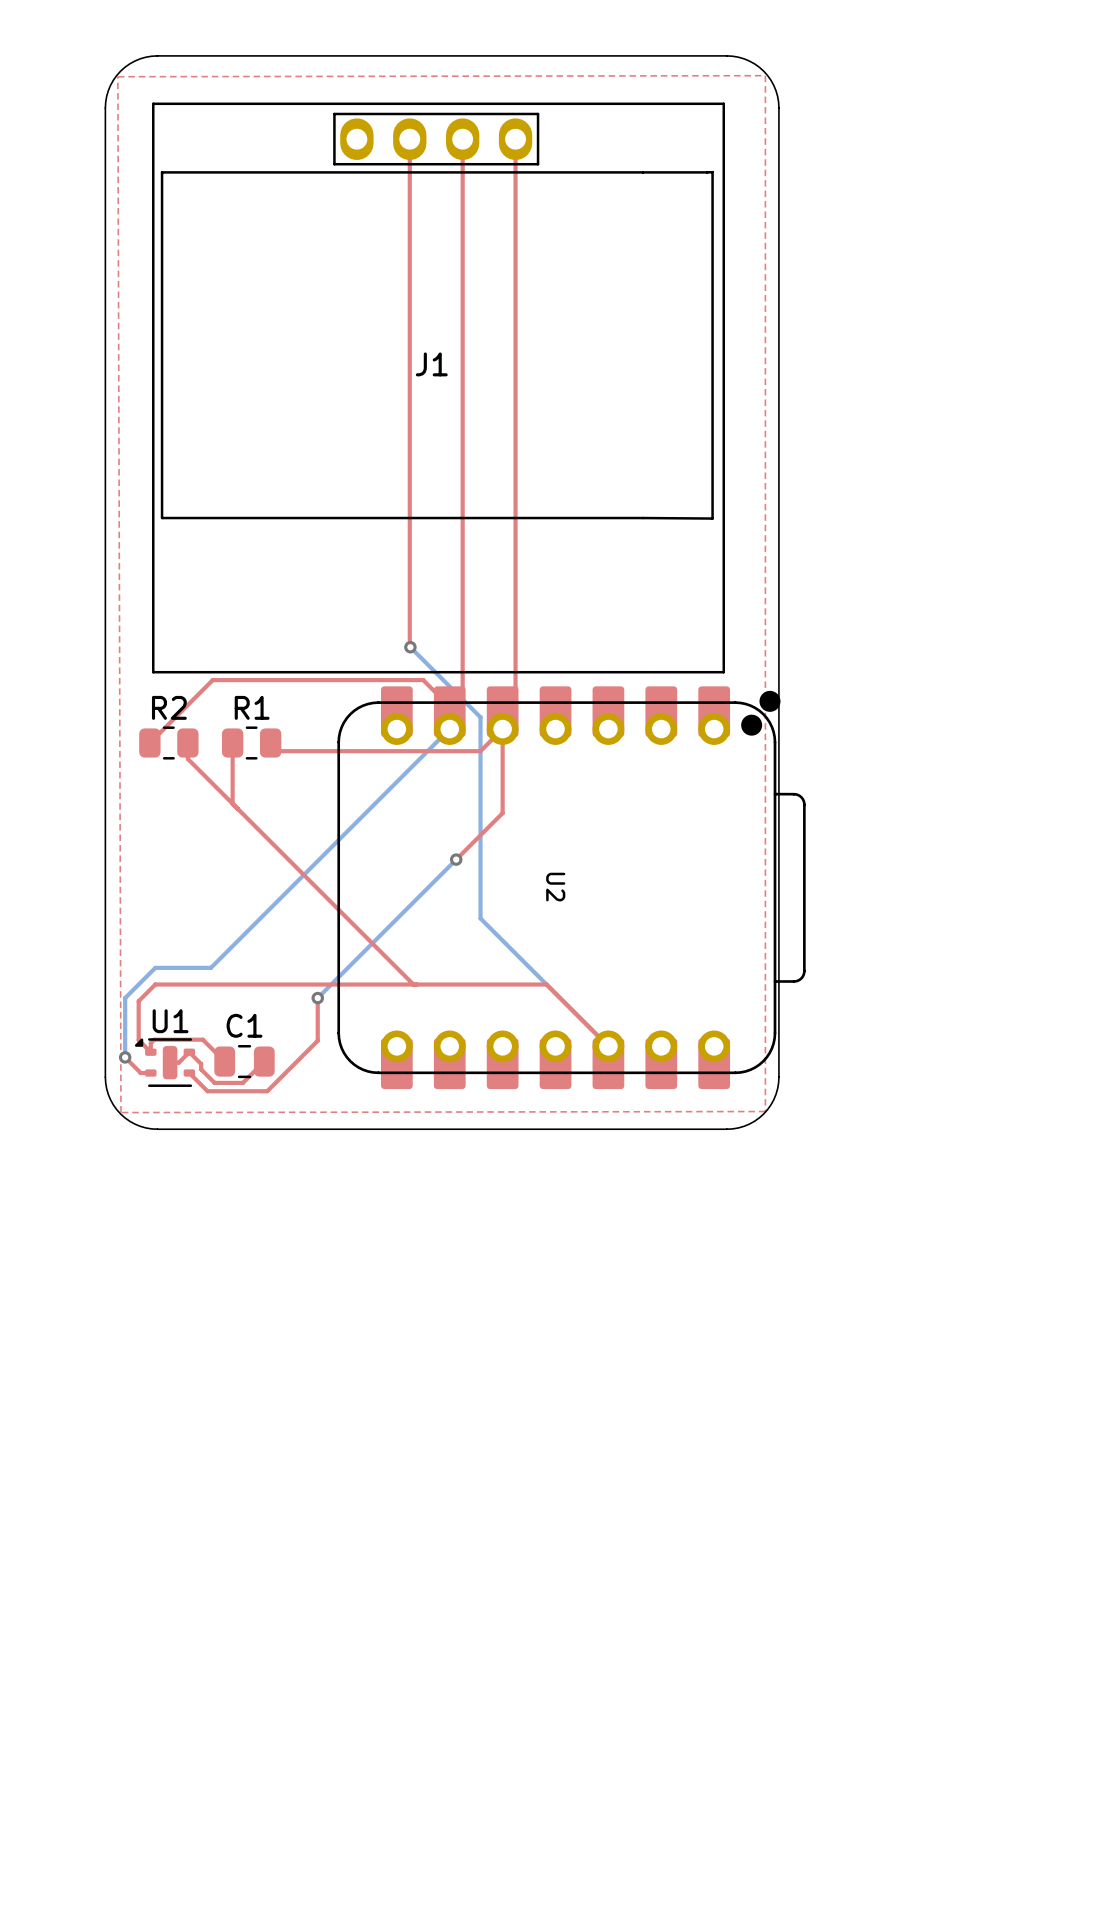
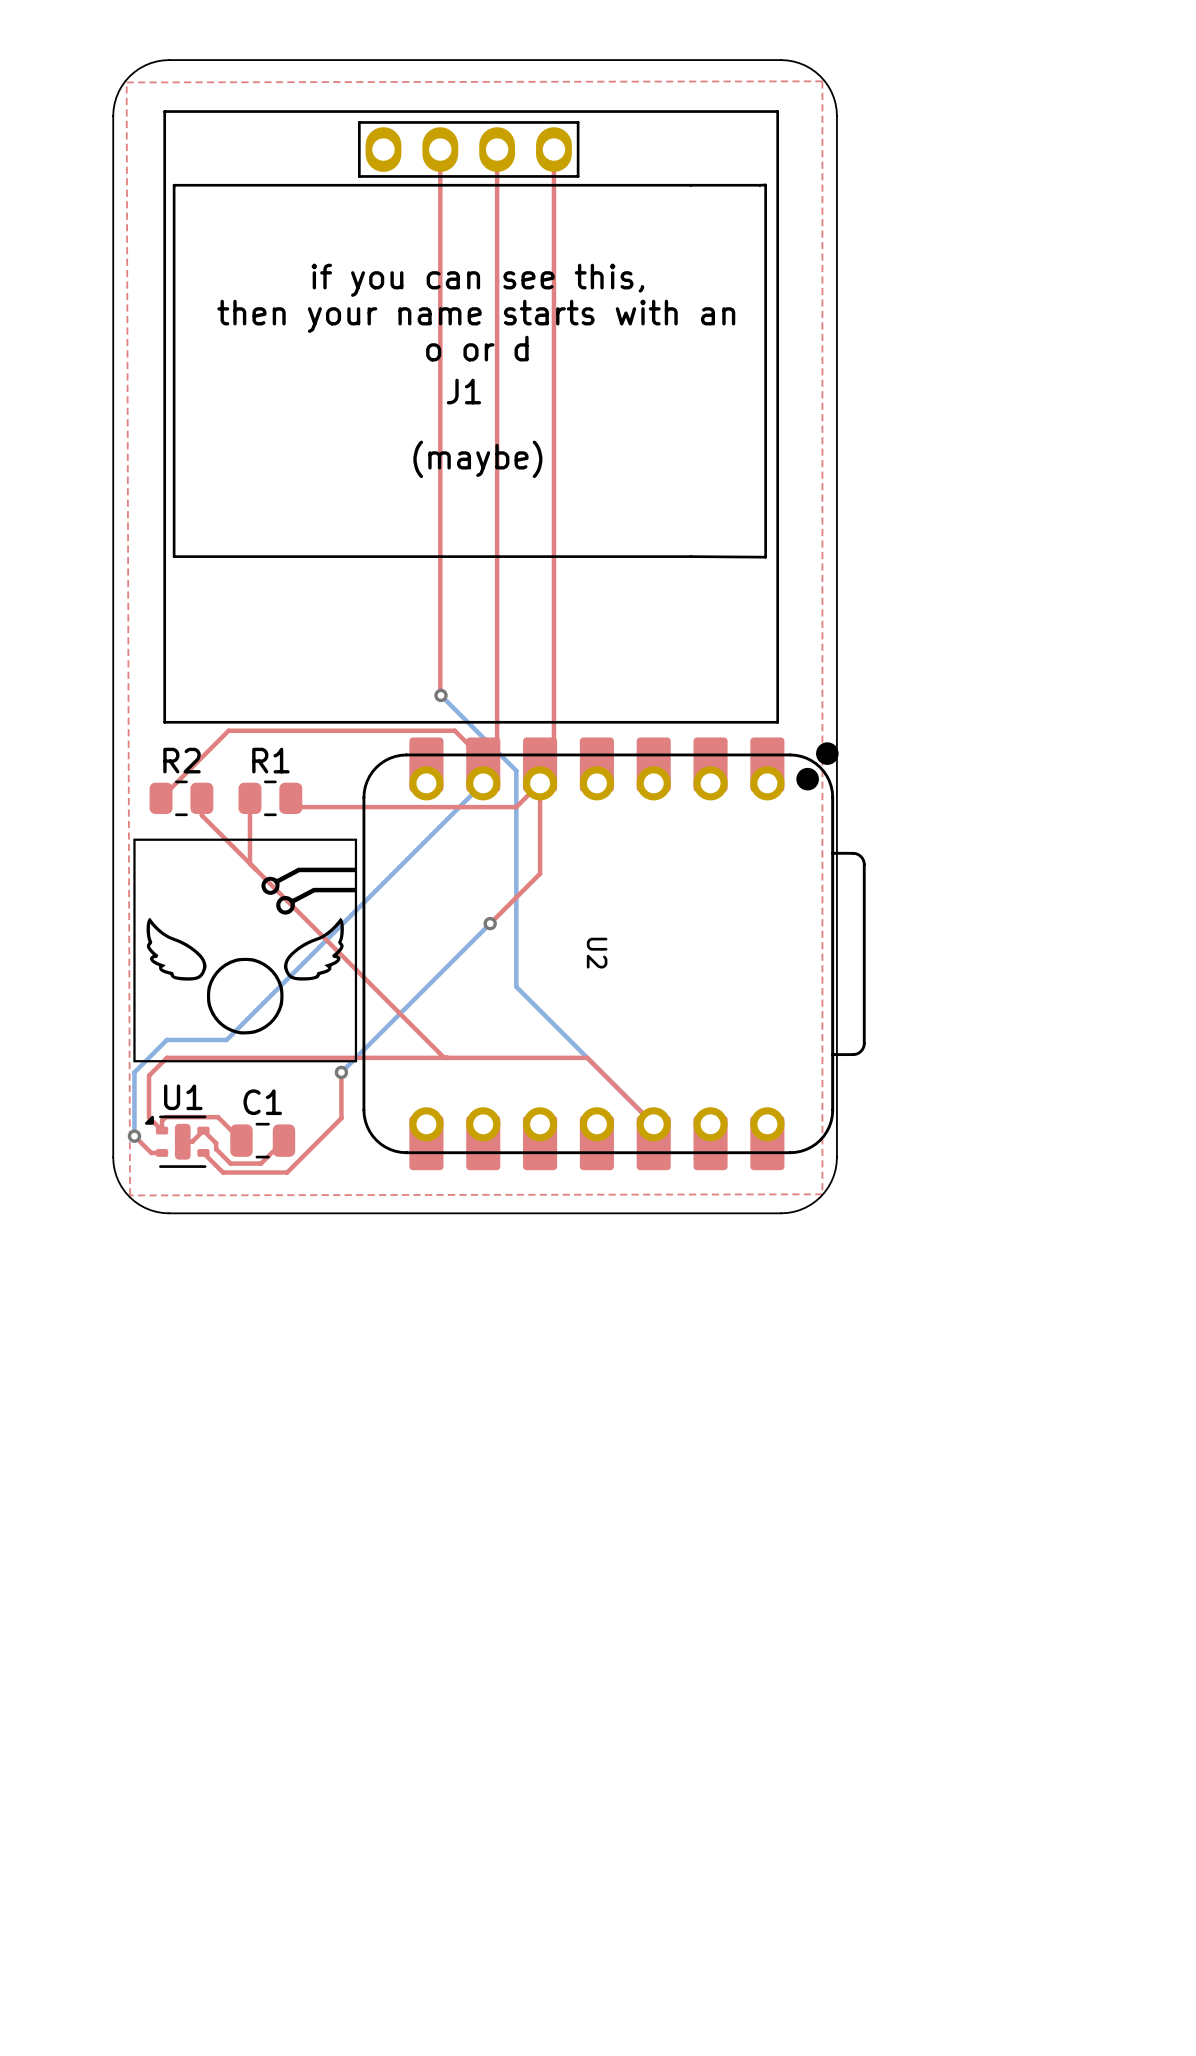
text: none -> if you can see this, (477, 280)
text: none -> then your name starts with an (476, 316)
text: none -> o or d (477, 348)
text: none -> (maybe) (477, 459)
drawing: none -> [133, 838, 358, 1063]

